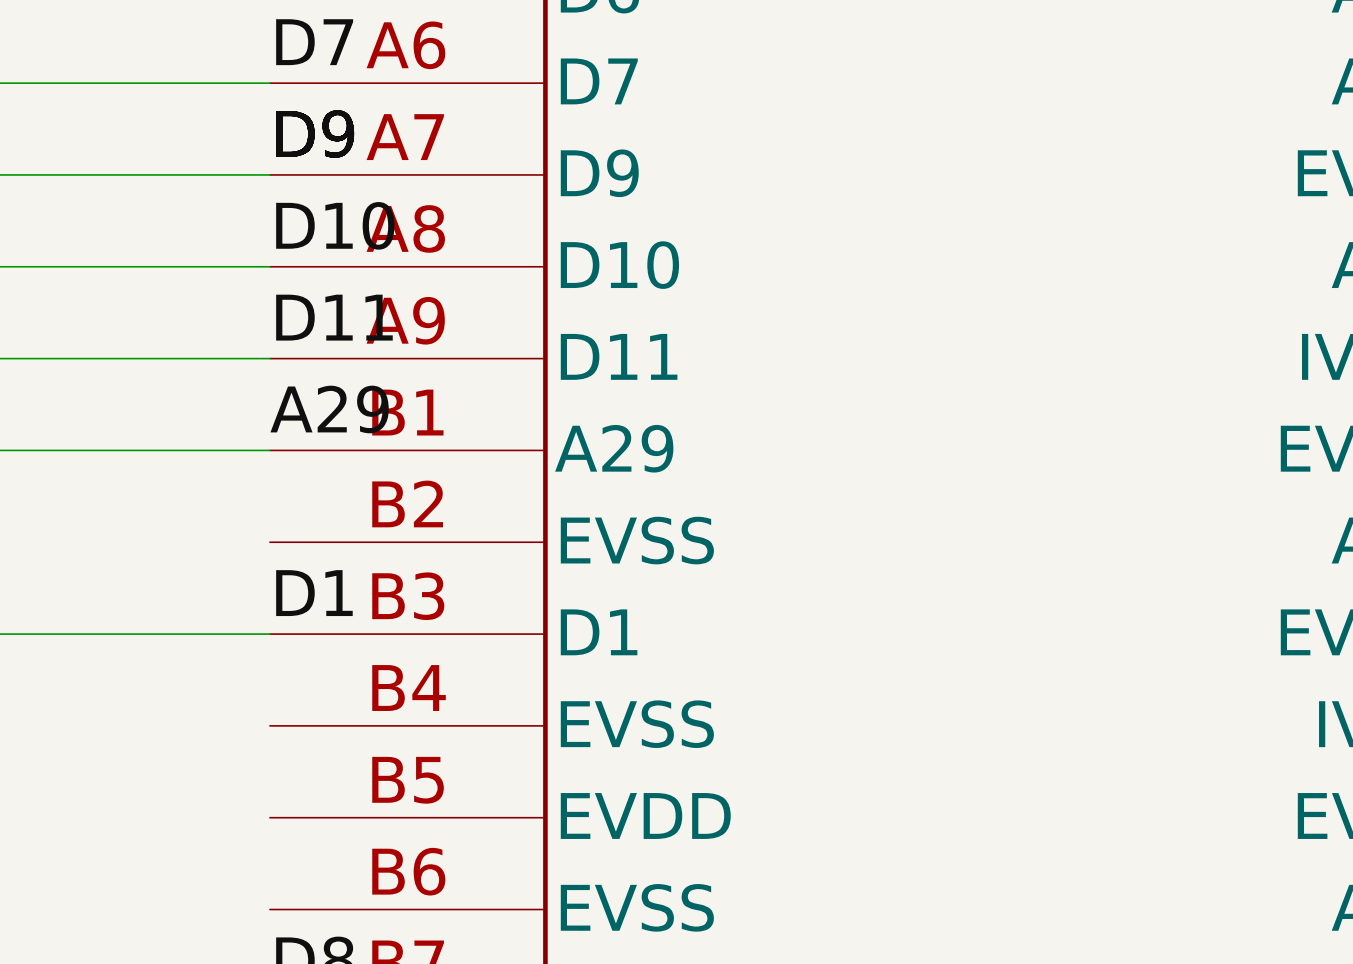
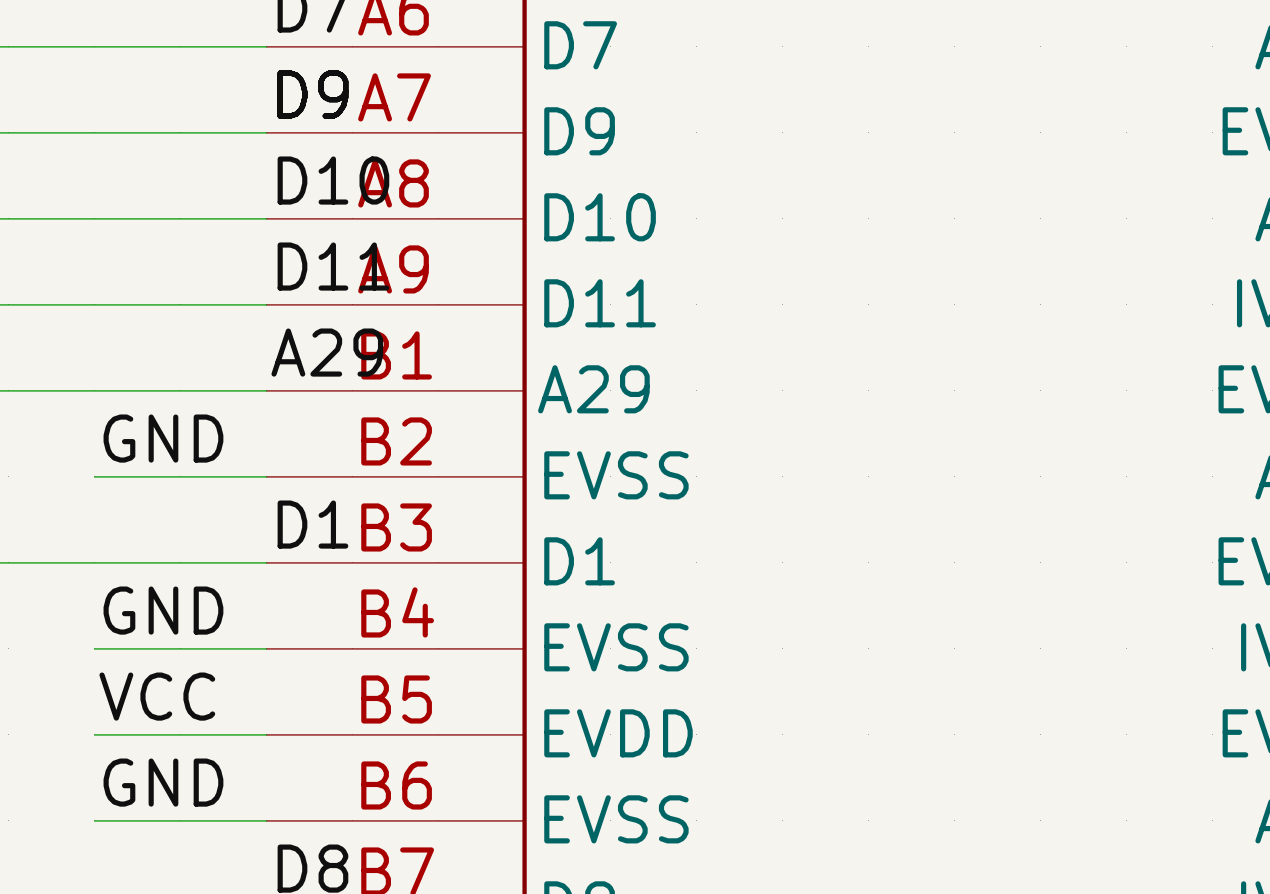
label: none -> GND (163, 438)
wire: none -> (94, 476) (266, 476)
label: none -> GND (163, 610)
wire: none -> (94, 648) (266, 648)
label: none -> VCC (157, 696)
wire: none -> (94, 734) (266, 734)
label: none -> GND (163, 782)
wire: none -> (94, 820) (266, 820)

